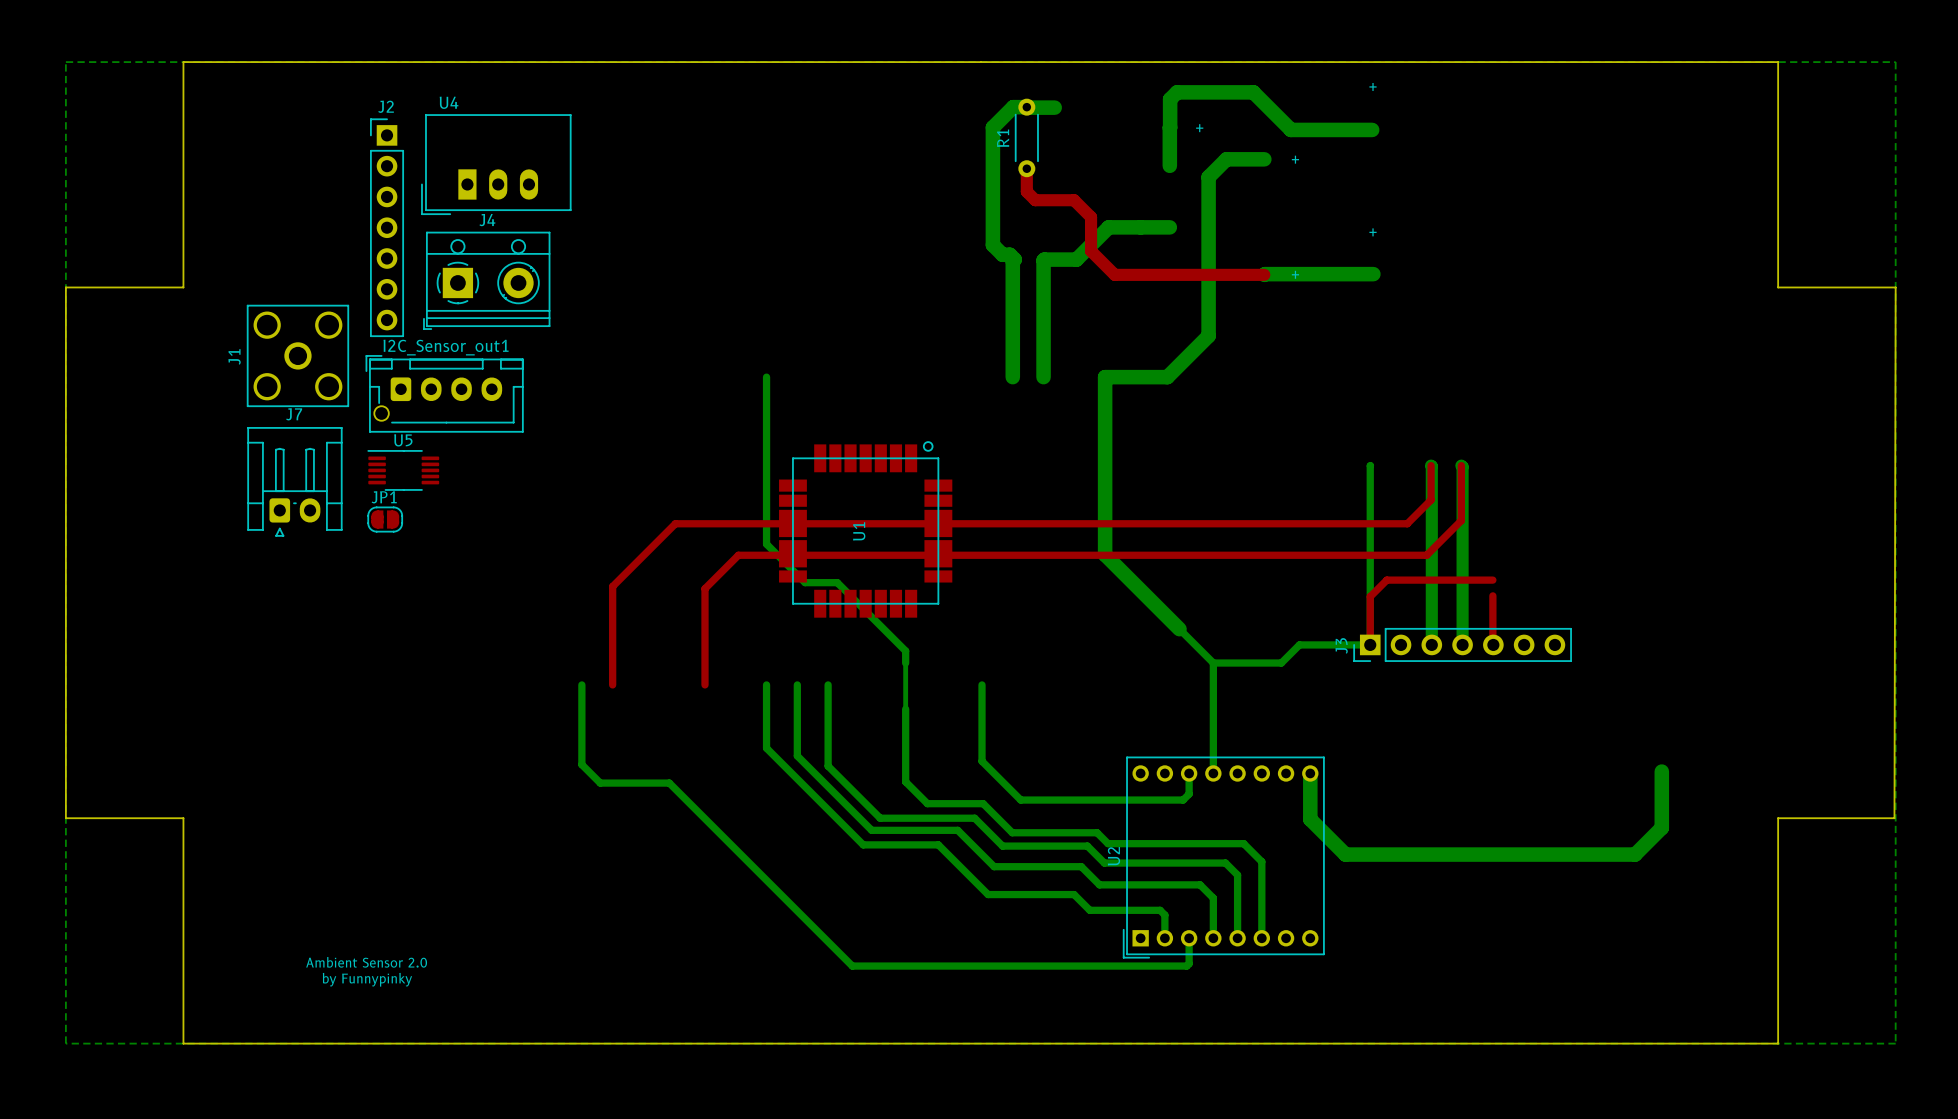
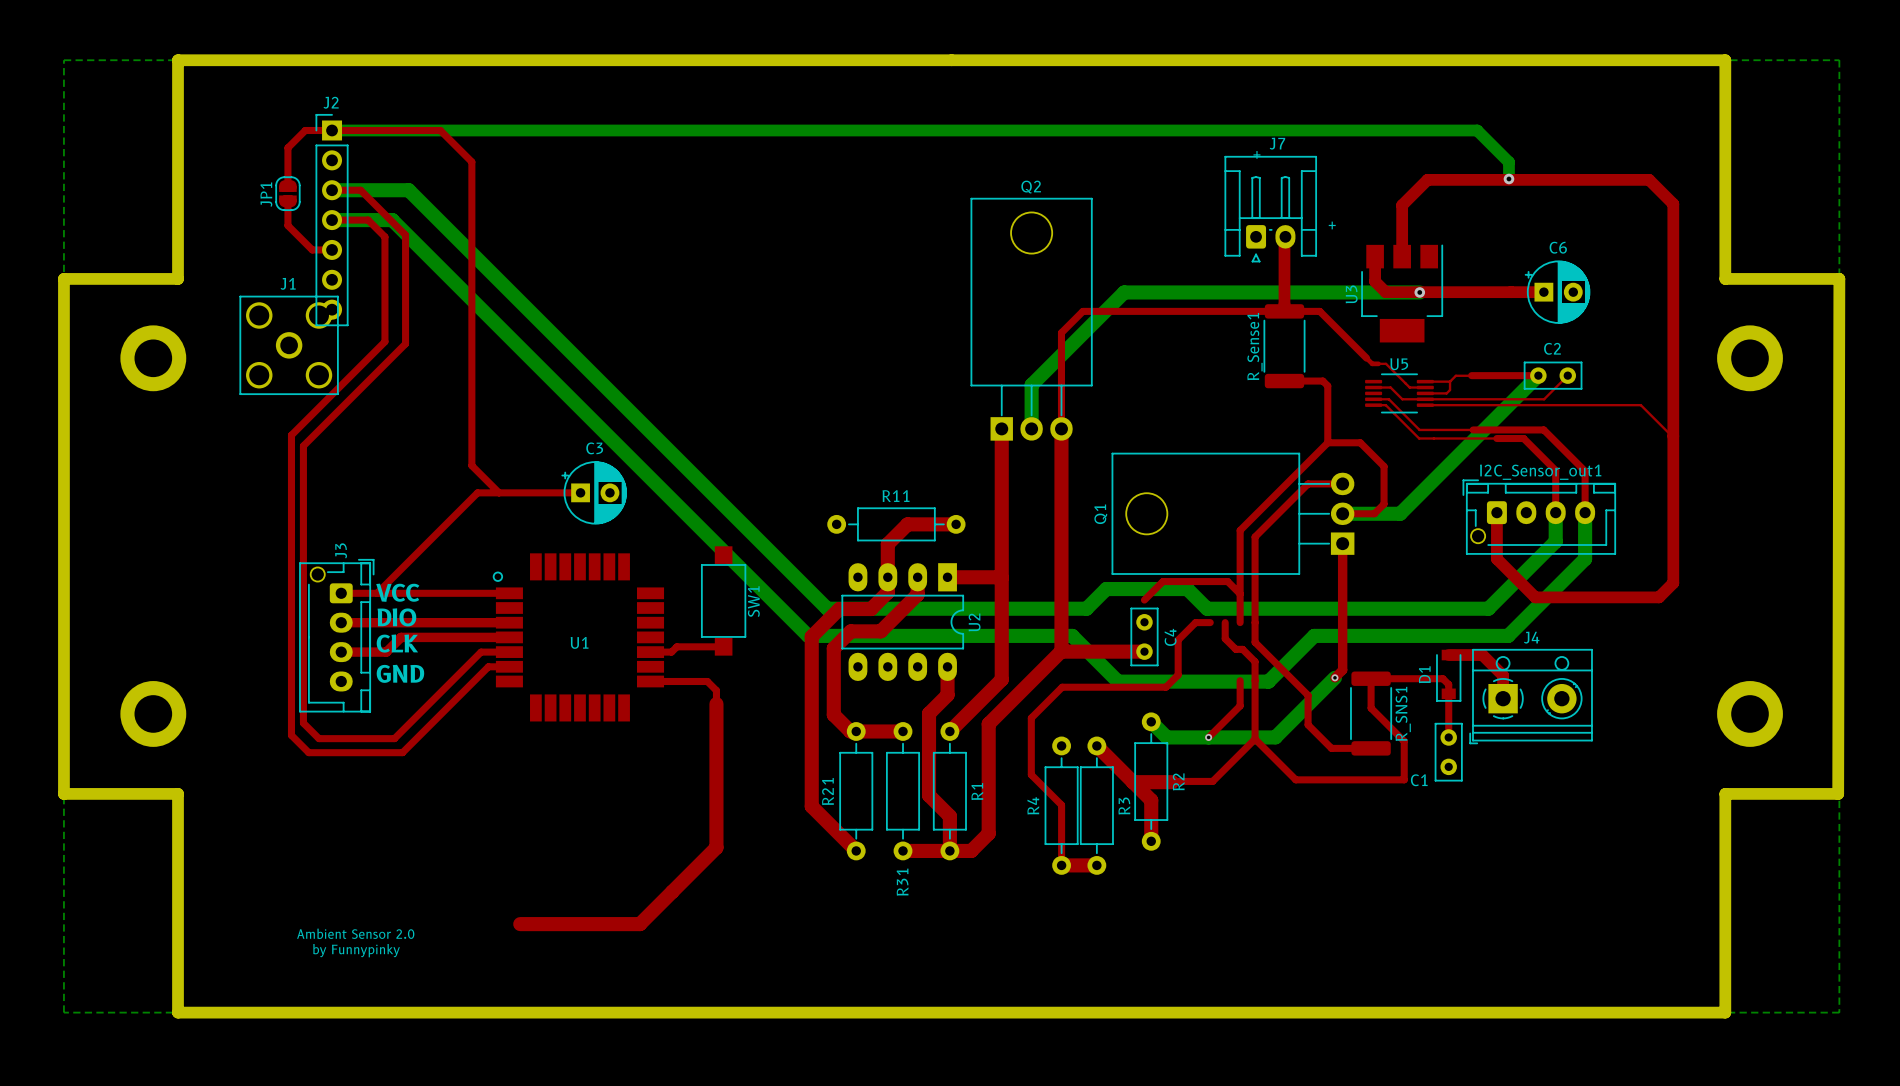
board edge width: thin (183, 62) (183, 287) (65, 287) (65, 818) (183, 818) (183, 1043) (1778, 1043) (1778, 818) (1894, 818) (1895, 287) (1778, 287) (1778, 62) (183, 62) -> thick (178, 60) (178, 278) (63, 278) (63, 793) (178, 793) (178, 1012) (1725, 1012) (1725, 793) (1838, 793) (1839, 278) (1725, 278) (1725, 60) (178, 60)
text: + (1373, 86) -> none
R1 footprint: [1014, 98, 1039, 178] -> [933, 722, 967, 861]
bottom track: (1054, 107) (1013, 107) (992, 127) (992, 245) (1002, 254) (1009, 254) (1014, 259) (1012, 261) (1012, 377) -> none
text: + (1199, 128) -> none
bottom track: (1372, 129) (1291, 129) (1253, 92) (1177, 92) (1170, 99) (1169, 165) -> none
bottom track: none -> (332, 130) (1477, 130) (1508, 162) (1508, 178)
R1 name position: R1 (1003, 138) -> R1 (977, 791)
bottom track: (1264, 159) (1226, 159) (1208, 177) (1208, 335) (1167, 377) (1105, 377) (1105, 554) (1213, 663) -> none
U4: (496, 164) -> none
top track: (1026, 168) (1026, 191) (1035, 200) (1074, 200) (1091, 217) (1091, 251) (1114, 274) (1264, 274) -> none
via: none -> (1508, 178)
top track: none -> (287, 186) (287, 147) (305, 130) (440, 130) (471, 161) (471, 465) (499, 492)
bottom track: none -> (332, 190) (408, 190) (827, 608) (1086, 608) (1106, 589) (1187, 589) (1207, 608) (1488, 608) (1555, 541) (1555, 512)
top track: none -> (332, 190) (360, 190) (405, 235) (405, 343) (303, 445) (303, 723) (318, 738) (394, 738) (481, 652) (509, 652)
top track: none -> (287, 201) (287, 225) (312, 249) (332, 249)
bottom track: none -> (332, 220) (392, 220) (808, 635) (1072, 635) (1118, 681) (1268, 681) (1314, 635) (1508, 635) (1585, 558) (1585, 512)
top track: none -> (332, 220) (368, 220) (384, 236) (384, 341) (291, 435) (291, 735) (308, 752) (402, 752) (488, 666) (509, 666)
J2 position: (387, 227) -> (332, 220)
bottom track: (1169, 227) (1108, 227) (1076, 259) (1043, 260) (1043, 377) -> none
top track: none -> (1285, 236) (1284, 311)
top track: none -> (1375, 256) (1375, 281) (1385, 292) (1511, 292)
top track: none -> (1402, 256) (1402, 205) (1427, 179) (1649, 179) (1673, 204) (1673, 583) (1658, 597) (1535, 597) (1496, 558) (1496, 512)
text: + (1295, 274) -> none
bottom track: (1373, 274) (1264, 274) -> none
J4 position: (486, 280) -> (1531, 696)
bottom track: none -> (1419, 292) (1124, 292) (1031, 385) (1031, 428)
via: none -> (1419, 292)
top track: none -> (1511, 292) (1543, 292)
C6: none -> (1557, 292)
U3: none -> (1402, 293)
Q2: none -> (1031, 319)
J1 name rotation: 0° (234, 356) -> 90° clockwise (288, 283)
J1 name position: J1 (234, 356) -> J1 (288, 283)
R_Sense1: none -> (1284, 346)
part: none -> (153, 358)
part: none -> (1750, 358)
bottom track: (766, 377) (766, 544) (805, 582) (837, 582) (905, 651) (905, 781) (927, 803) (983, 803) (1012, 832) (1097, 832) (1108, 843) (1243, 843) (1261, 861) (1261, 938) -> none
top track: none -> (1471, 375) (1538, 375)
top track: none -> (1471, 375) (1455, 375) (1450, 381)
bottom track: none -> (1538, 375) (1400, 513) (1342, 513)
C2: none -> (1553, 375)
top track: none -> (1567, 375) (1544, 399) (1402, 399) (1390, 387) (1373, 387)
top track: none -> (1284, 381) (1322, 381) (1327, 385) (1327, 442)
I2C_Sensor_out1 position: (444, 393) -> (1539, 517)
top track: none -> (1425, 381) (1450, 381)
top track: none -> (1450, 381) (1450, 390) (1446, 393) (1425, 393)
top track: none -> (1425, 387) (1409, 387) (1386, 363) (1372, 363) (1319, 311) (1082, 311) (1061, 332) (1061, 651) (988, 723) (988, 833) (971, 850) (903, 850)
top track: none -> (1373, 399) (1388, 399) (1419, 429) (1543, 429) (1585, 471) (1585, 512)
J7 name position: J7 (294, 414) -> J7 (1277, 143)
top track: none -> (1373, 405) (1385, 405) (1419, 438) (1523, 438) (1555, 470) (1555, 512)
top track: none -> (1425, 405) (1640, 405) (1673, 436)
U1 footprint: [779, 441, 953, 618] -> [492, 553, 665, 722]
top track: none -> (1001, 428) (1001, 679) (949, 731)
U5 footprint: [367, 450, 440, 491] -> [1365, 373, 1434, 414]
top track: none -> (1327, 442) (1240, 530) (1240, 622)
top track: none -> (1327, 442) (1360, 442) (1384, 466) (1384, 504) (1374, 513) (1342, 513)
bottom track: (1370, 465) (1370, 644) (1299, 644) (1281, 663) (1213, 663) -> none
bottom track: (1431, 465) (1431, 644) -> none
top track: (1431, 465) (1431, 500) (1407, 523) (675, 523) (612, 586) (612, 684) -> none
bottom track: (1461, 465) (1462, 644) -> none
top track: (1461, 465) (1461, 520) (1426, 555) (738, 555) (704, 588) (704, 684) -> none
J7 position: (294, 481) -> (1270, 209)
JP1 name position: JP1 (384, 497) -> JP1 (266, 194)
top track: none -> (1342, 483) (1308, 483) (1255, 536) (1255, 642) (1308, 695) (1308, 724) (1331, 748) (1371, 748)
top track: none -> (580, 492) (477, 492) (377, 593)
C3: none -> (594, 492)
JP1 rotation: 0° (385, 519) -> 90° clockwise (287, 193)
JP1 position: (385, 519) -> (287, 193)
Q1: none -> (1233, 513)
R11: none -> (896, 524)
top track: none -> (956, 524) (907, 524) (887, 544) (887, 592) (871, 609) (839, 609) (811, 636) (811, 806) (856, 850)
top track: none -> (1342, 543) (1342, 670) (1334, 677)
top track: (1492, 580) (1386, 580) (1370, 596) (1370, 644) -> none
top track: none -> (917, 577) (917, 594) (880, 631) (850, 631) (833, 648) (833, 714) (850, 731) (903, 731)
top track: none -> (947, 577) (1001, 577)
top track: (1492, 595) (1493, 644) -> none
text: none -> VCC (397, 592)
top track: none -> (341, 593) (509, 593)
top track: none -> (1240, 593) (1227, 581) (1162, 581) (1144, 600)
SW1: none -> (723, 600)
J3 footprint: [1353, 628, 1572, 662] -> [299, 559, 375, 713]
text: none -> DIO (396, 617)
top track: none -> (341, 622) (509, 622)
top track: none -> (1210, 622) (1195, 622) (1178, 640) (1178, 675) (1165, 687) (1062, 687) (1031, 718) (1031, 774) (1061, 805) (1061, 865) (1096, 865)
top track: none -> (1225, 622) (1225, 638) (1235, 649) (1242, 649) (1255, 661) (1255, 739)
J3 name position: J3 (1341, 645) -> J3 (341, 550)
top track: none -> (509, 637) (401, 637) (386, 652) (341, 652)
C4: none -> (1144, 636)
text: none -> CLK (397, 643)
bottom track: (1213, 663) (1213, 773) -> none
top track: none -> (723, 646) (676, 646) (671, 652) (650, 652)
top track: none -> (1061, 651) (1144, 651)
top track: none -> (1448, 655) (1482, 655) (1503, 675) (1503, 698)
bottom track: (581, 684) (581, 764) (600, 783) (669, 783) (852, 966) (1186, 966) (1189, 963) (1189, 938) -> none
bottom track: (766, 684) (766, 748) (863, 844) (938, 844) (988, 894) (1074, 894) (1089, 910) (1160, 910) (1164, 915) (1164, 938) -> none
bottom track: (797, 684) (797, 755) (871, 830) (957, 830) (994, 866) (1081, 866) (1099, 884) (1200, 884) (1213, 898) (1213, 938) -> none
bottom track: (828, 684) (828, 766) (880, 818) (974, 818) (1002, 846) (1087, 846) (1104, 863) (1225, 863) (1237, 875) (1237, 938) -> none
bottom track: (982, 684) (982, 761) (1020, 800) (1183, 800) (1189, 794) (1189, 773) -> none
top track: none -> (947, 666) (947, 695) (929, 713) (929, 795) (949, 816) (949, 850)
text: none -> GND (400, 673)
D1: none -> (1448, 675)
bottom track: none -> (1334, 677) (1275, 737)
via: none -> (1334, 677)
top track: none -> (1240, 680) (1240, 705) (1208, 737)
top track: none -> (650, 681) (707, 681) (716, 690) (716, 847) (640, 924) (520, 924)
part: none -> (153, 713)
R_SNS1: none -> (1371, 713)
part: none -> (1750, 713)
bottom track: none -> (1151, 721) (1166, 737) (1275, 737)
U2 footprint: [1122, 756, 1325, 959] -> [841, 563, 964, 681]
via: none -> (1208, 737)
top track: none -> (1448, 737) (1448, 684) (1442, 678) (1371, 678) (1371, 708) (1404, 741) (1404, 779) (1295, 779) (1255, 739)
top track: none -> (1255, 739) (1212, 781) (1133, 782)
top track: none -> (1096, 745) (1151, 800) (1151, 841)
bottom track: (1661, 771) (1661, 827) (1635, 854) (1345, 854) (1310, 819) (1310, 773) -> none
C1: none -> (1448, 752)
R2: none -> (1151, 781)
R21: none -> (856, 791)
R31: none -> (903, 791)
R4: none -> (1061, 805)
R3: none -> (1096, 805)
U2 name position: U2 (1113, 856) -> U2 (974, 622)

